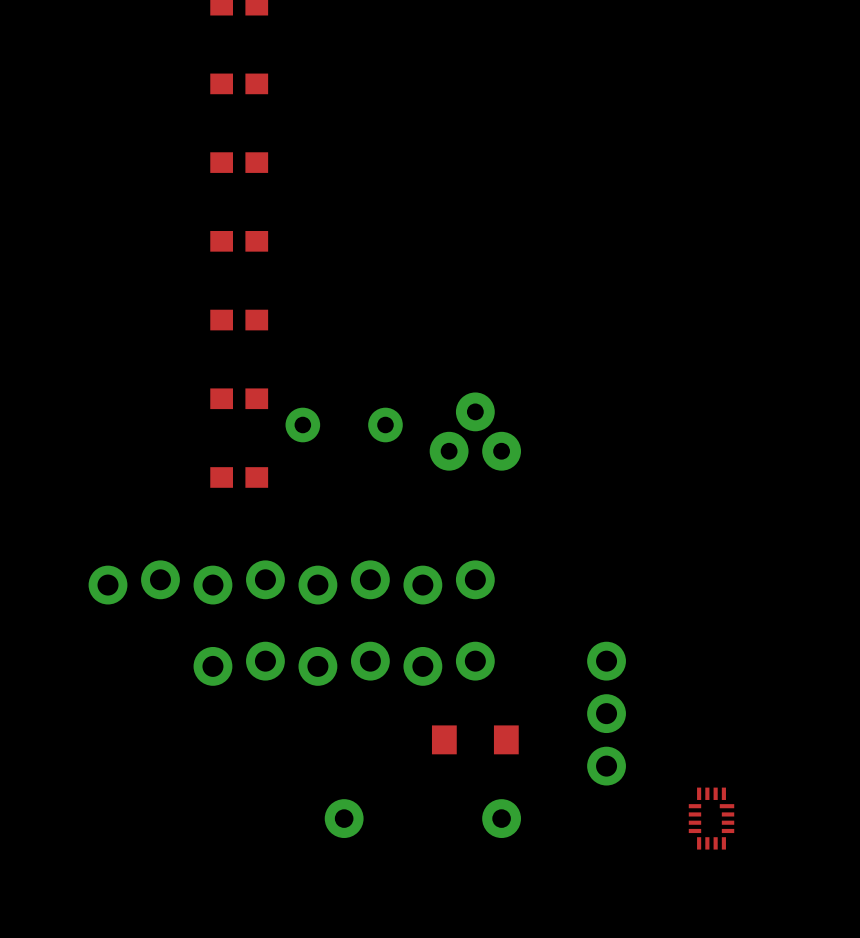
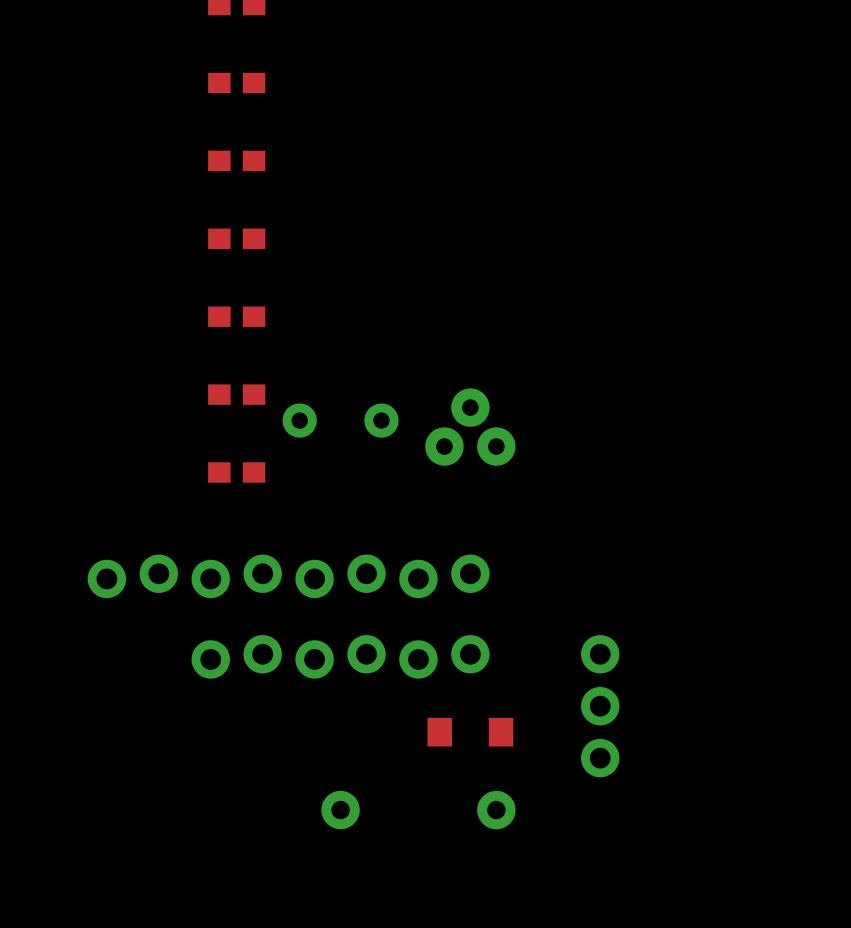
part: (711, 818) -> none

